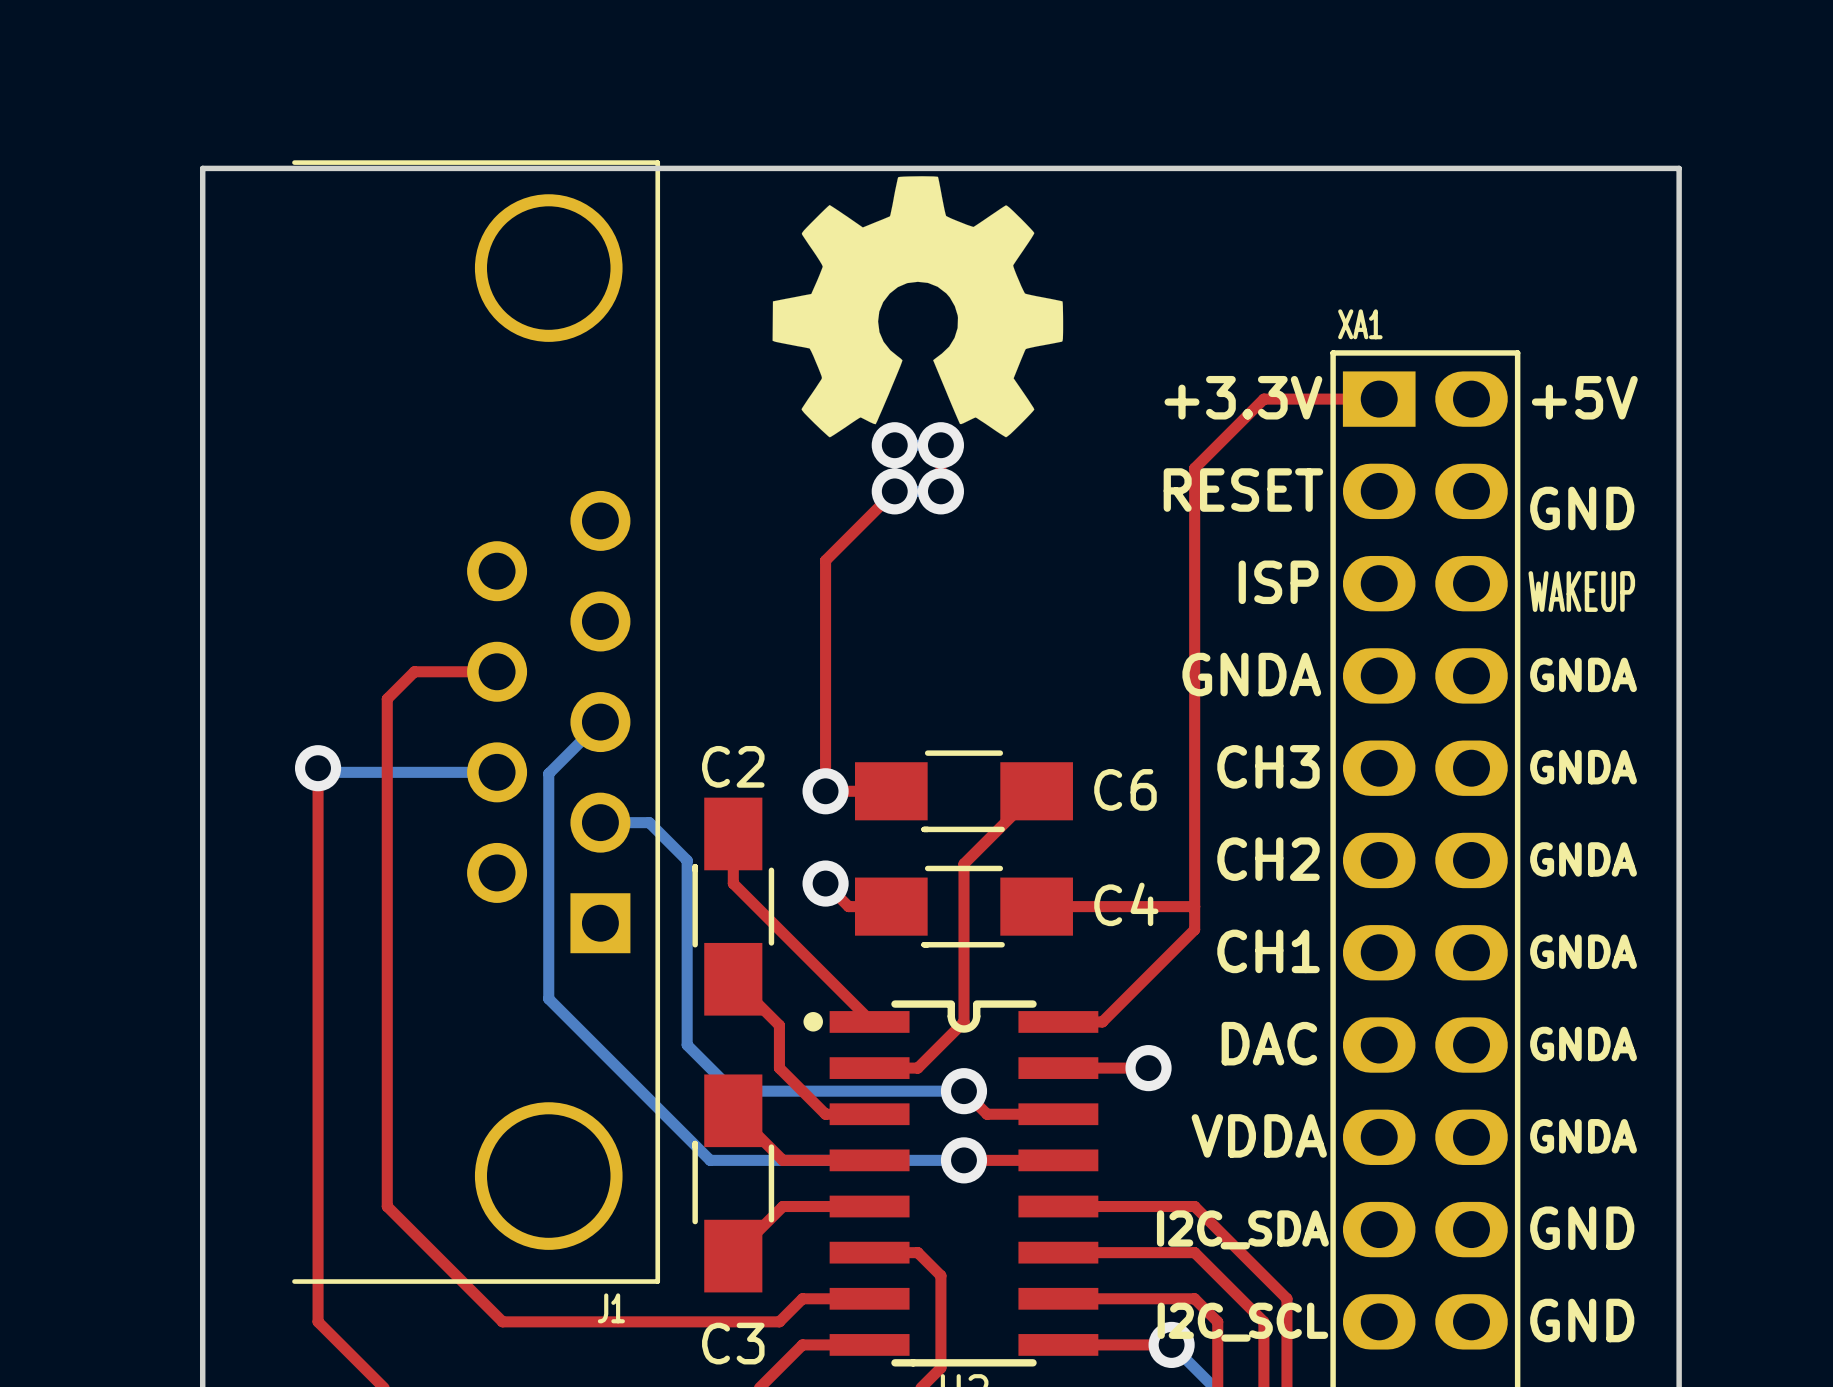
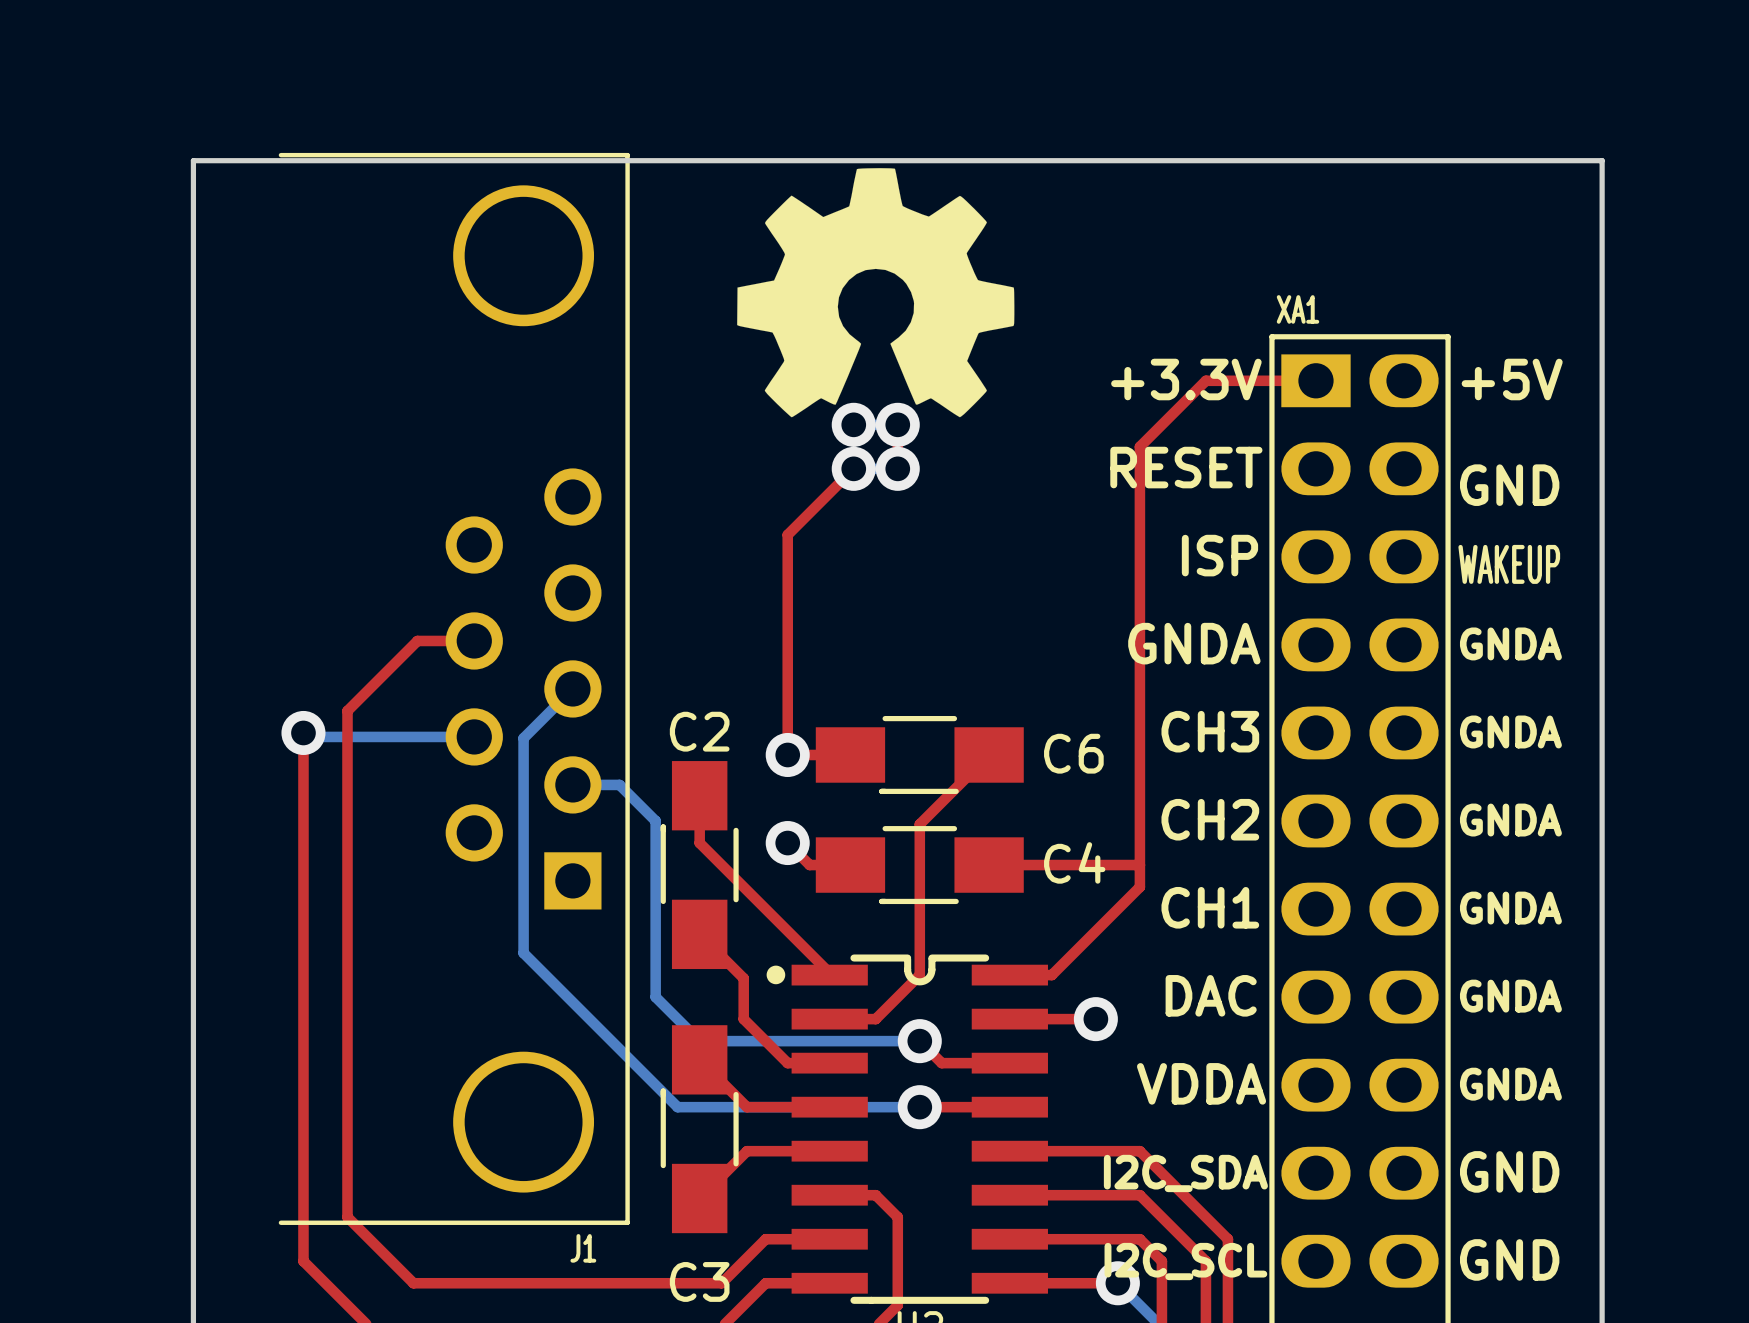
top track: (437, 671) (414, 671) (387, 698) (387, 1206) (502, 1321) (779, 1321) -> (417, 640) (347, 710) (347, 1217) (413, 1283) (721, 1283) (743, 1261)

